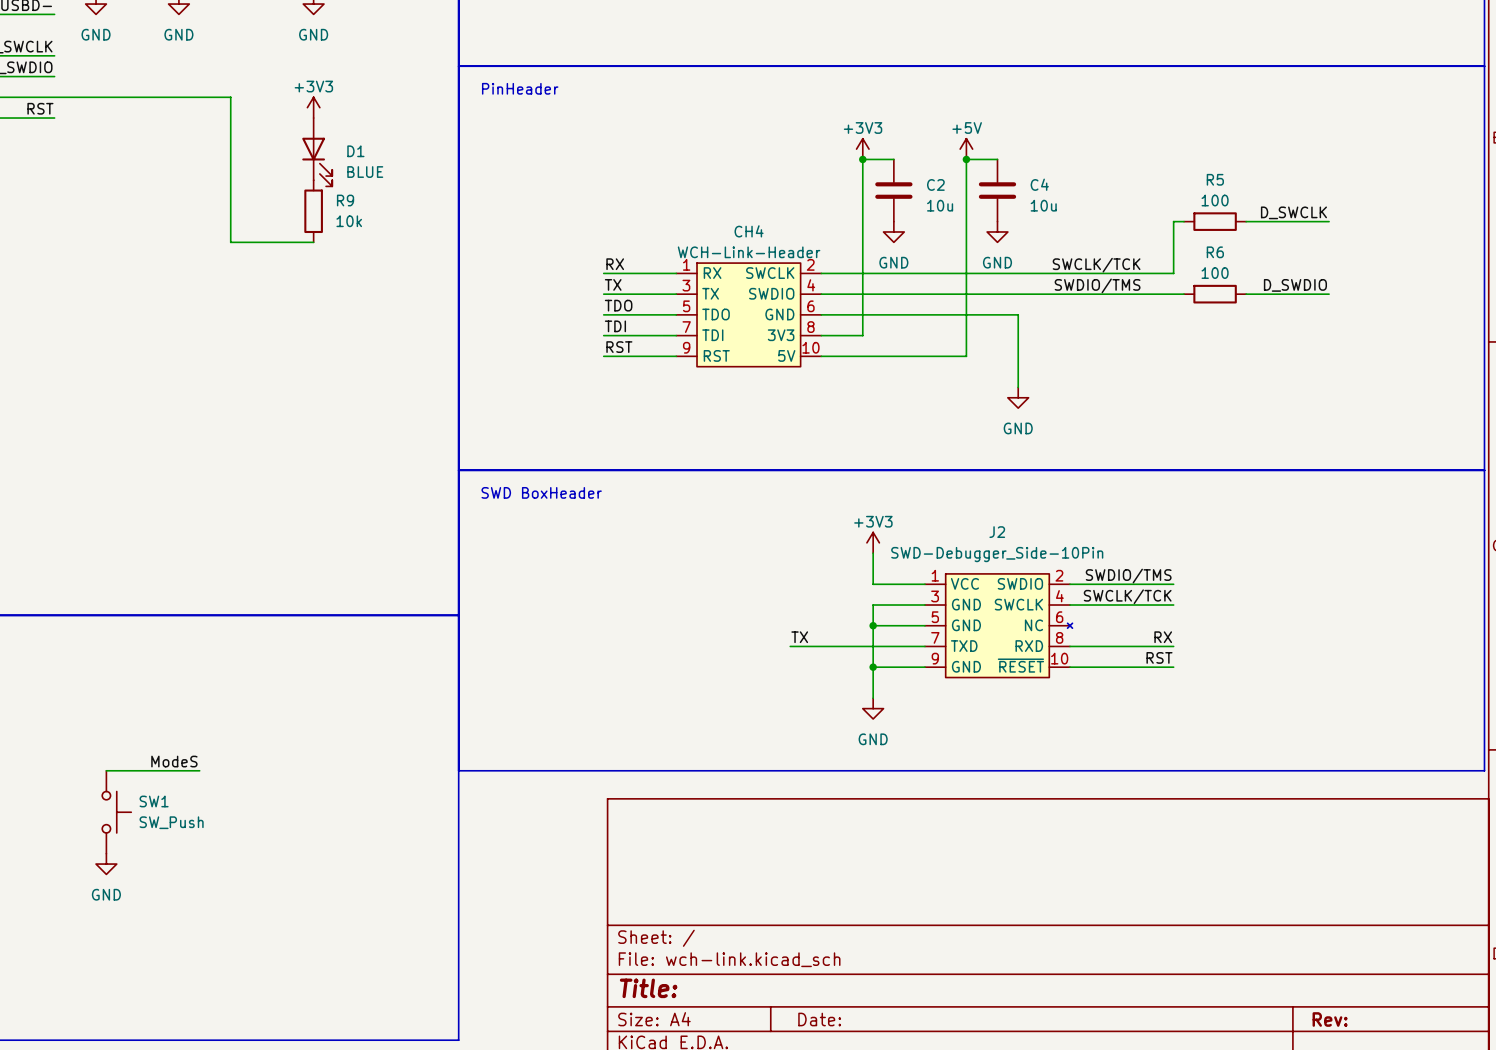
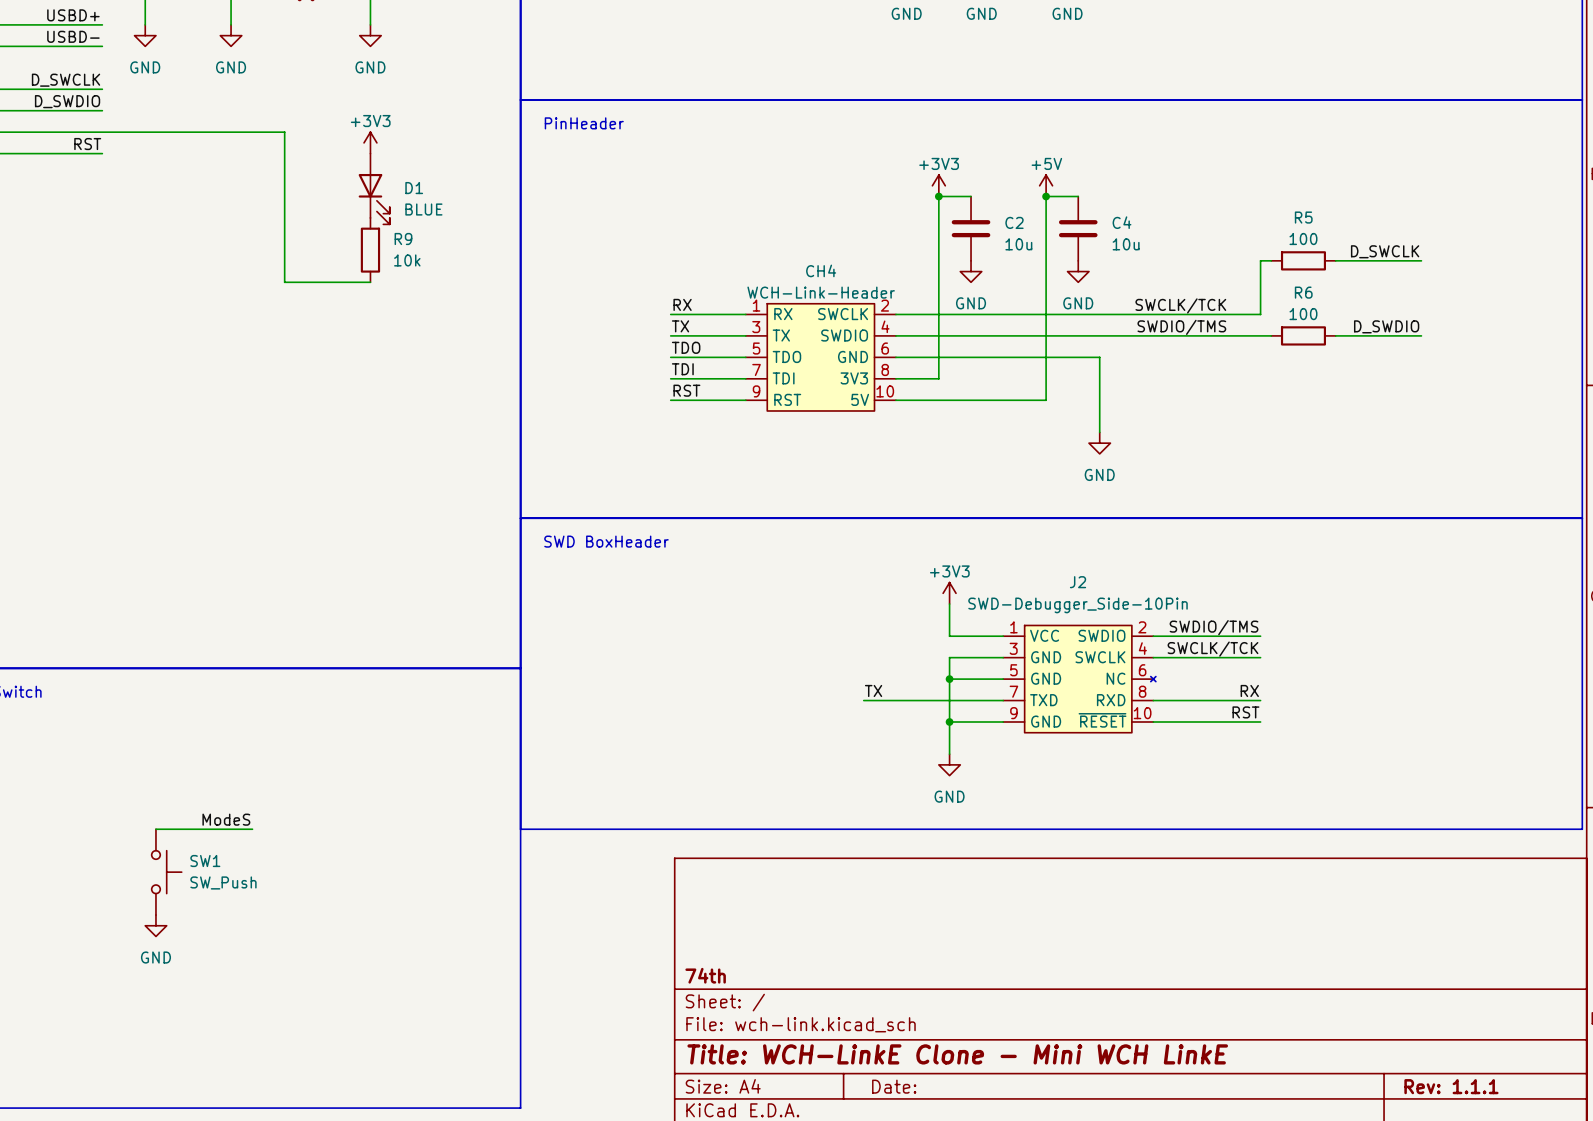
title block: none -> 74th (705, 975)
title block: Title: (648, 988) -> Title: WCH-LinkE Clone - Mini WCH LinkE (957, 1054)
title block: Rev: (1330, 1019) -> Rev: 1.1.1 (1451, 1086)

